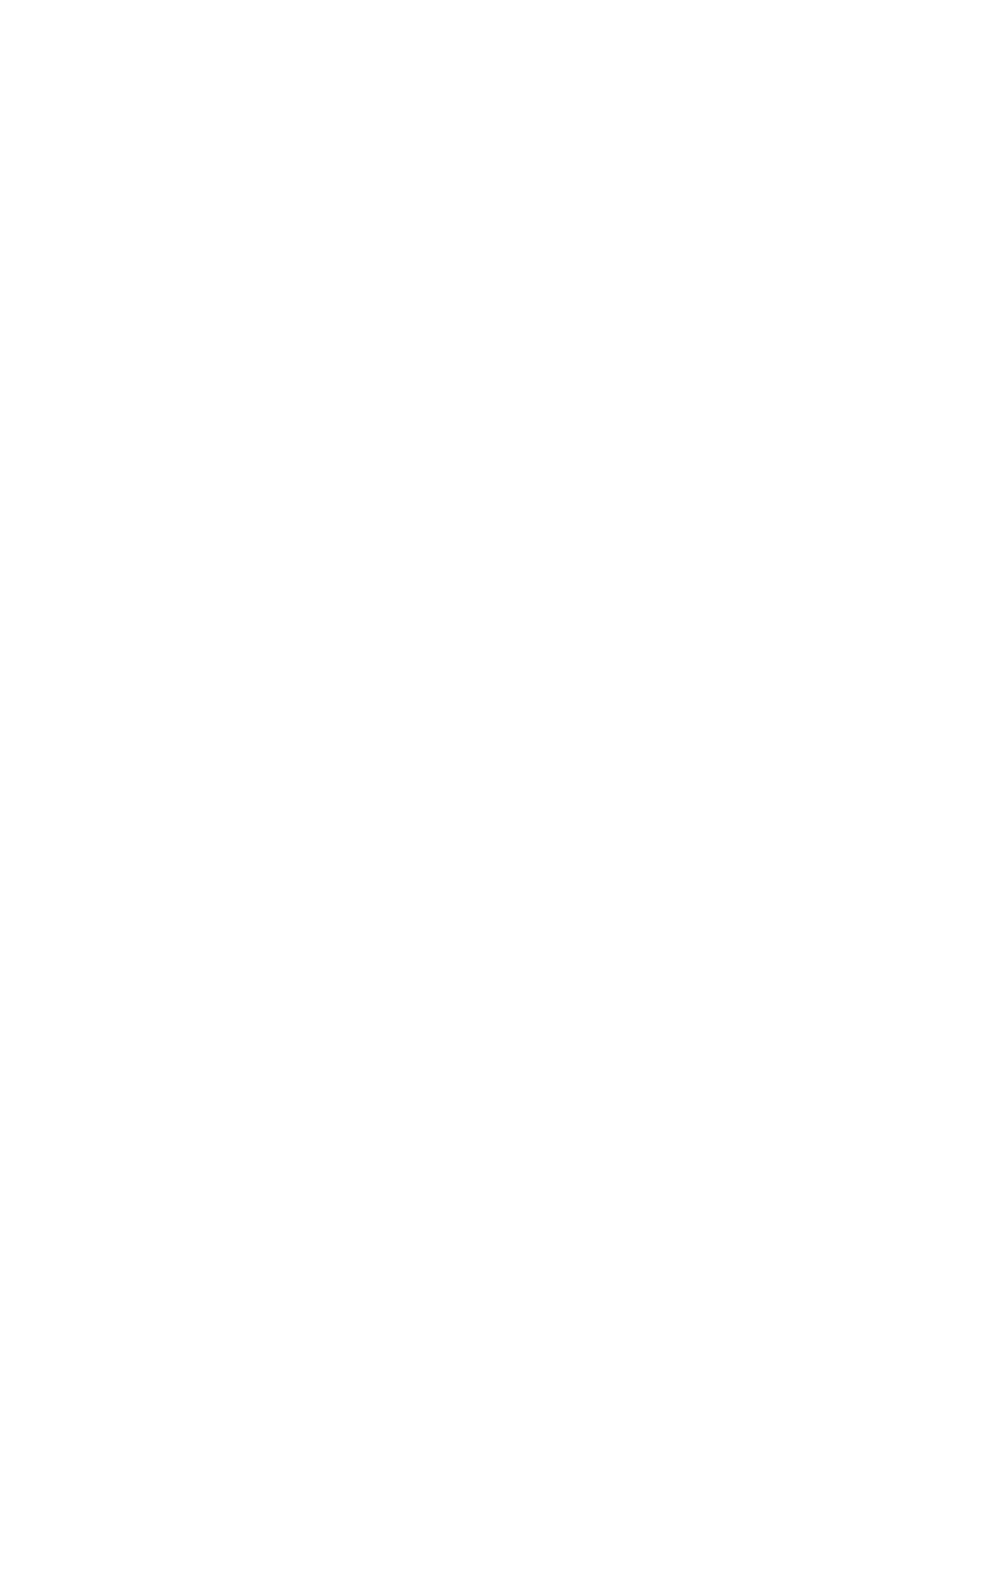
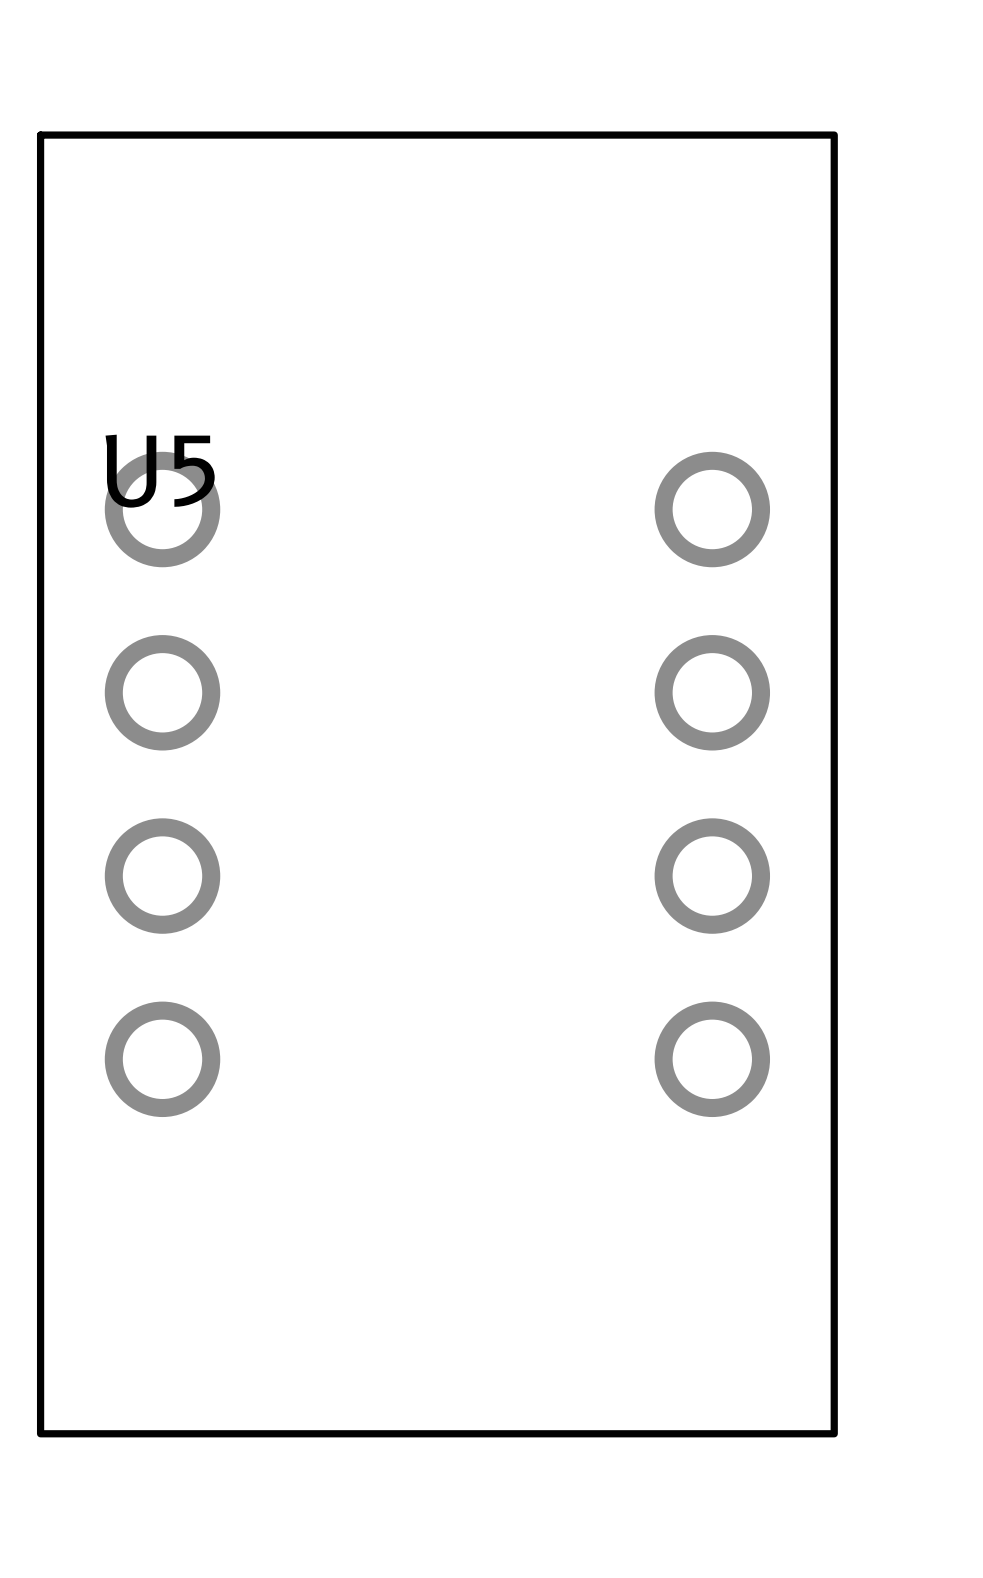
U5: none -> (437, 784)

